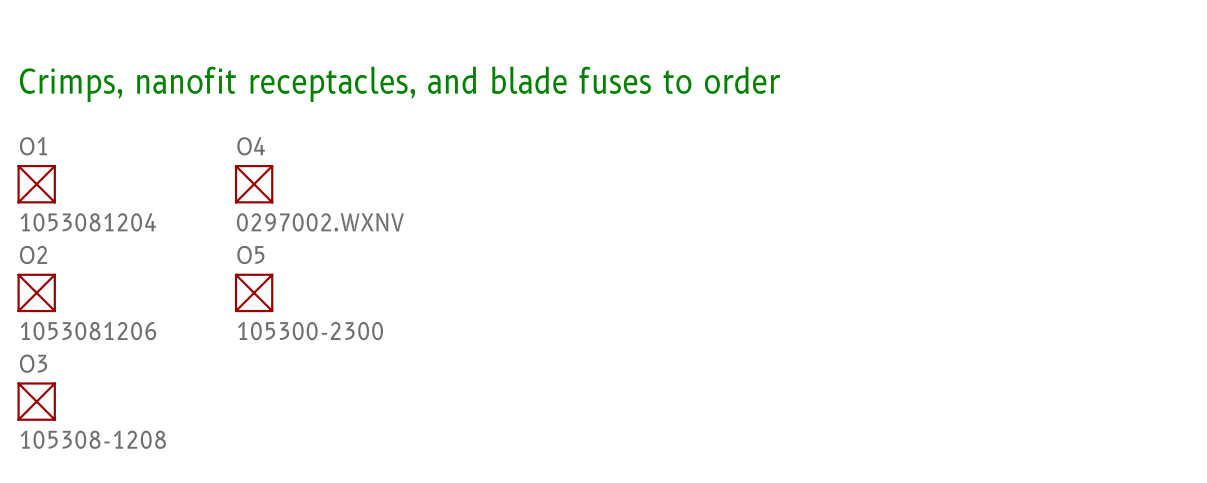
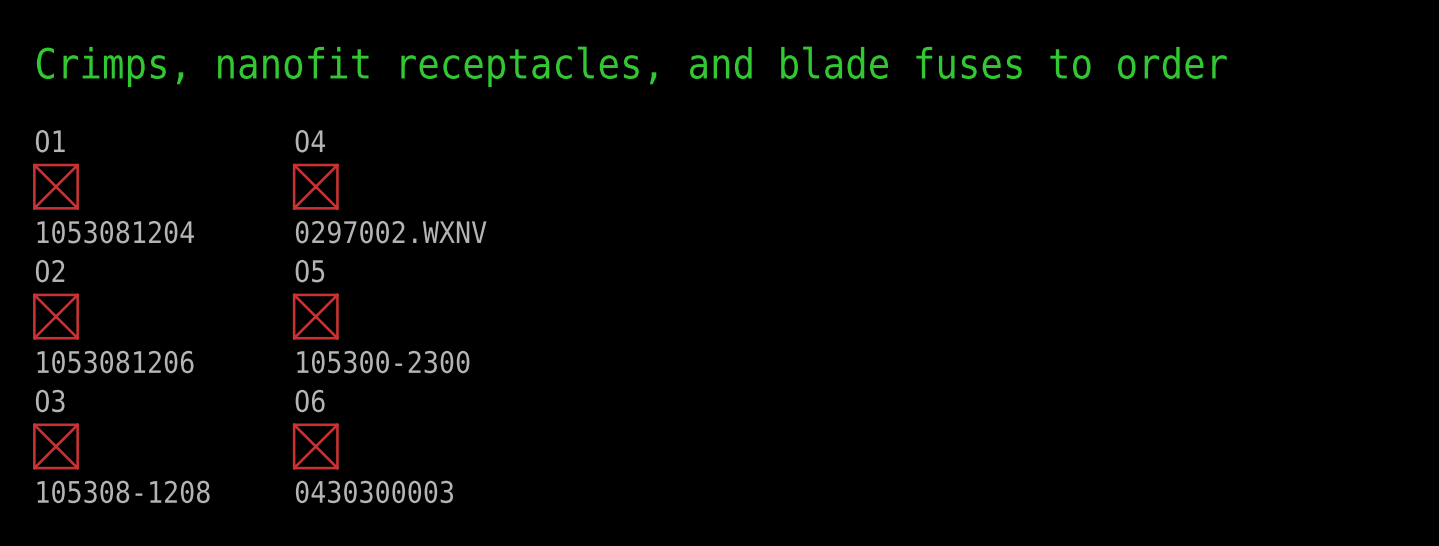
O6: none -> (315, 446)

